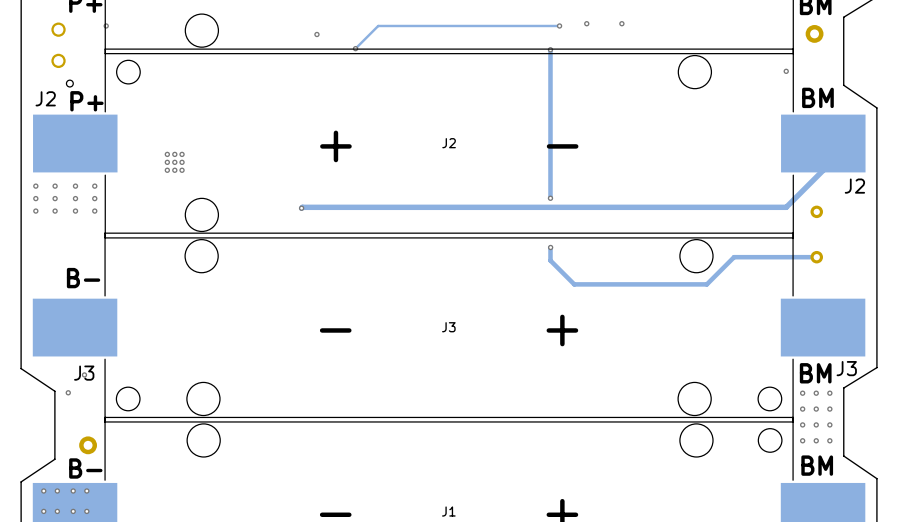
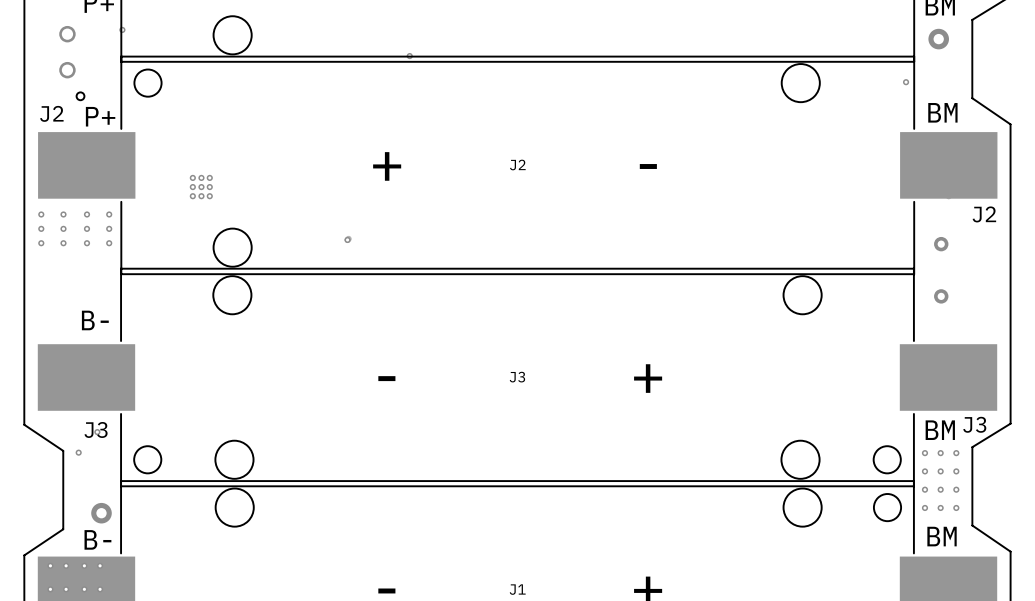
via: (586, 23) -> none
via: (621, 23) -> none
track: (559, 25) (378, 25) (355, 48) -> none
via: (559, 25) -> none
via: (316, 34) -> none
track: (550, 49) (550, 198) -> none
via: (550, 49) -> none
track: (823, 170) (786, 207) (302, 207) -> none
via: (550, 198) -> none
track: (550, 247) (550, 260) (574, 284) (706, 284) (734, 257) (812, 257) -> none
via: (550, 247) -> none

